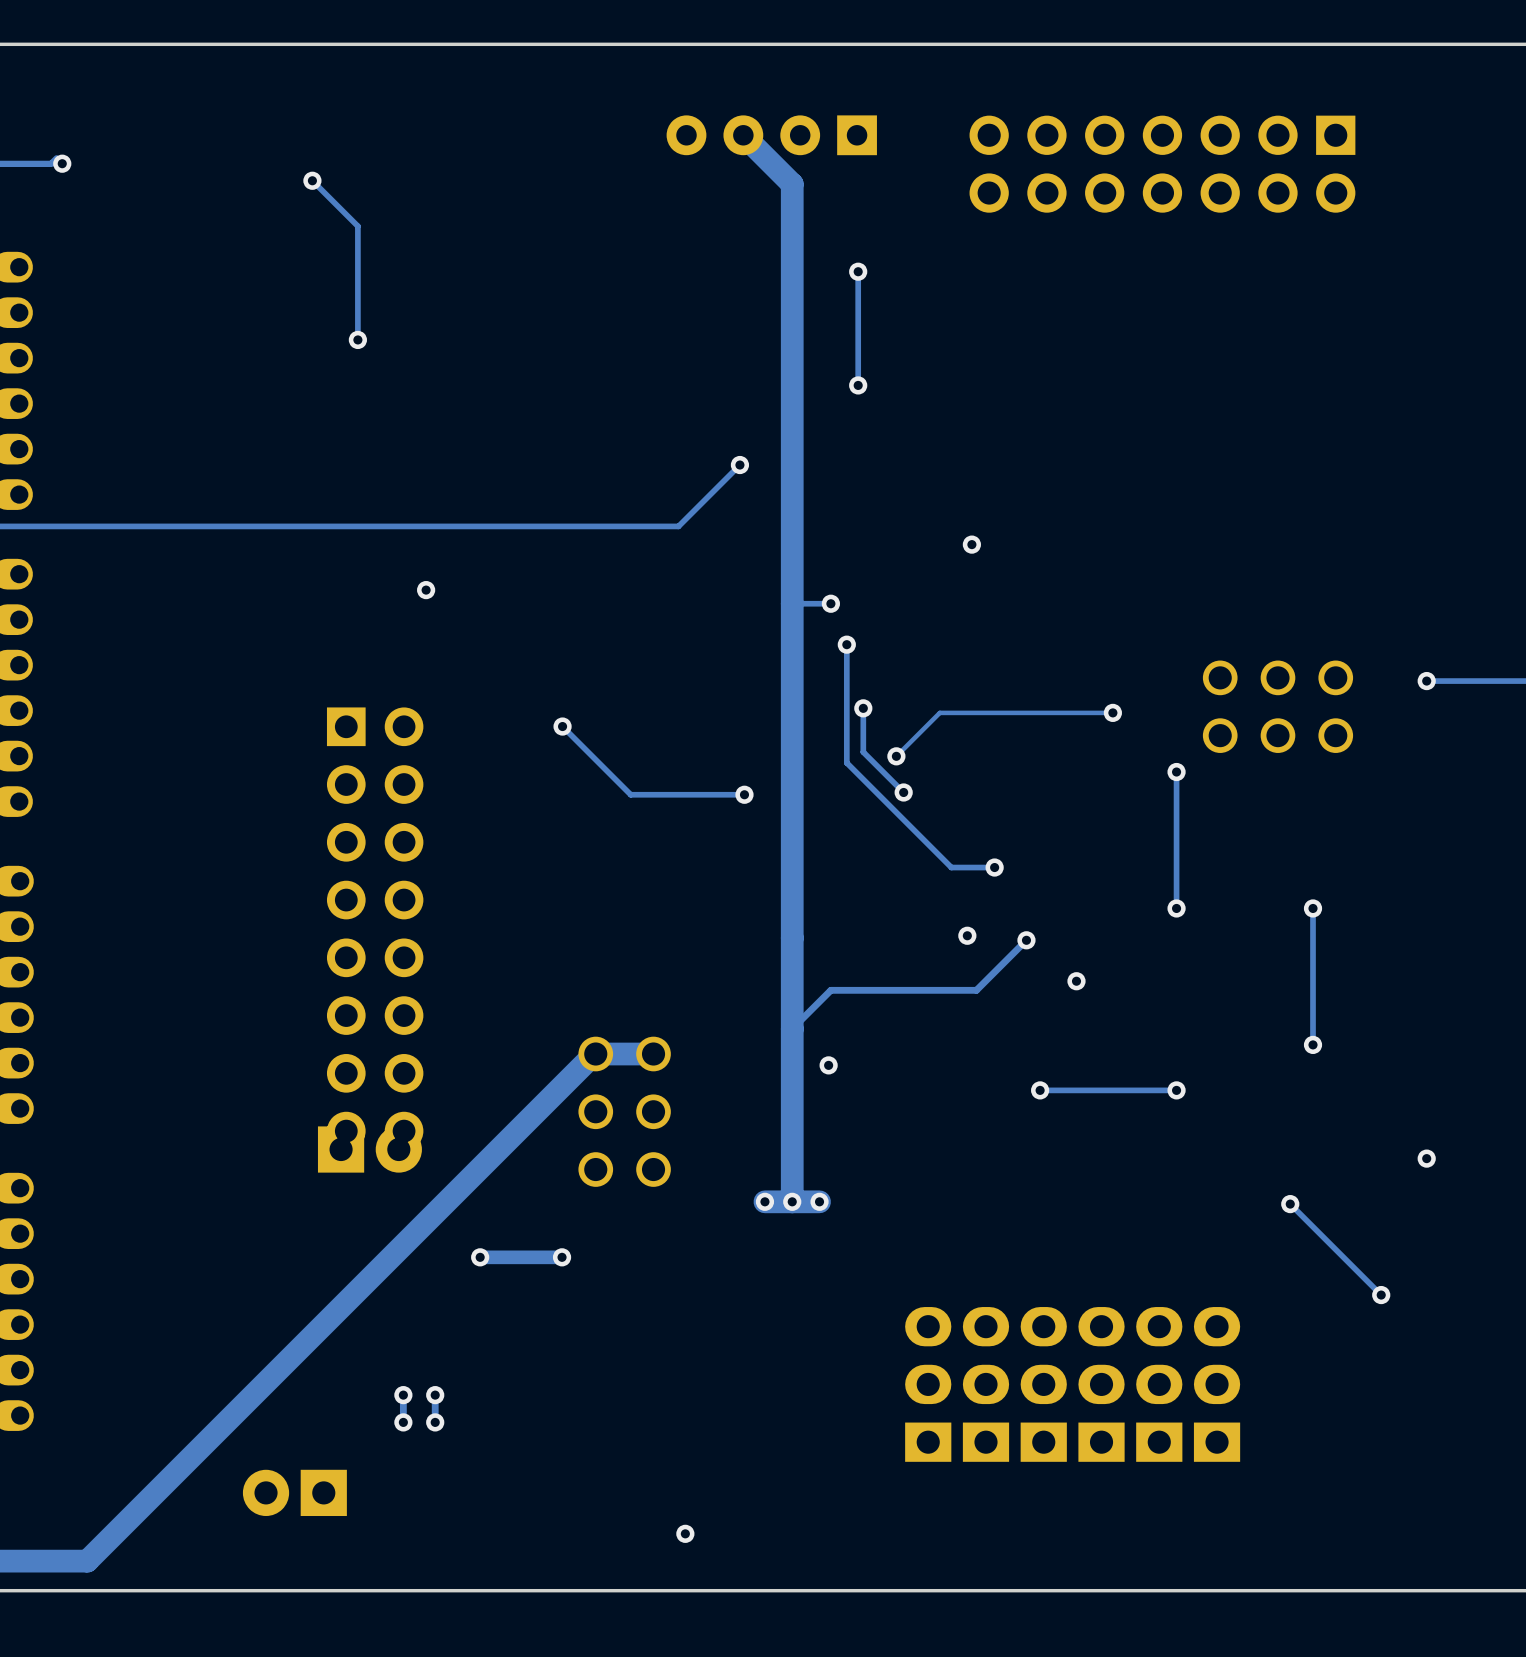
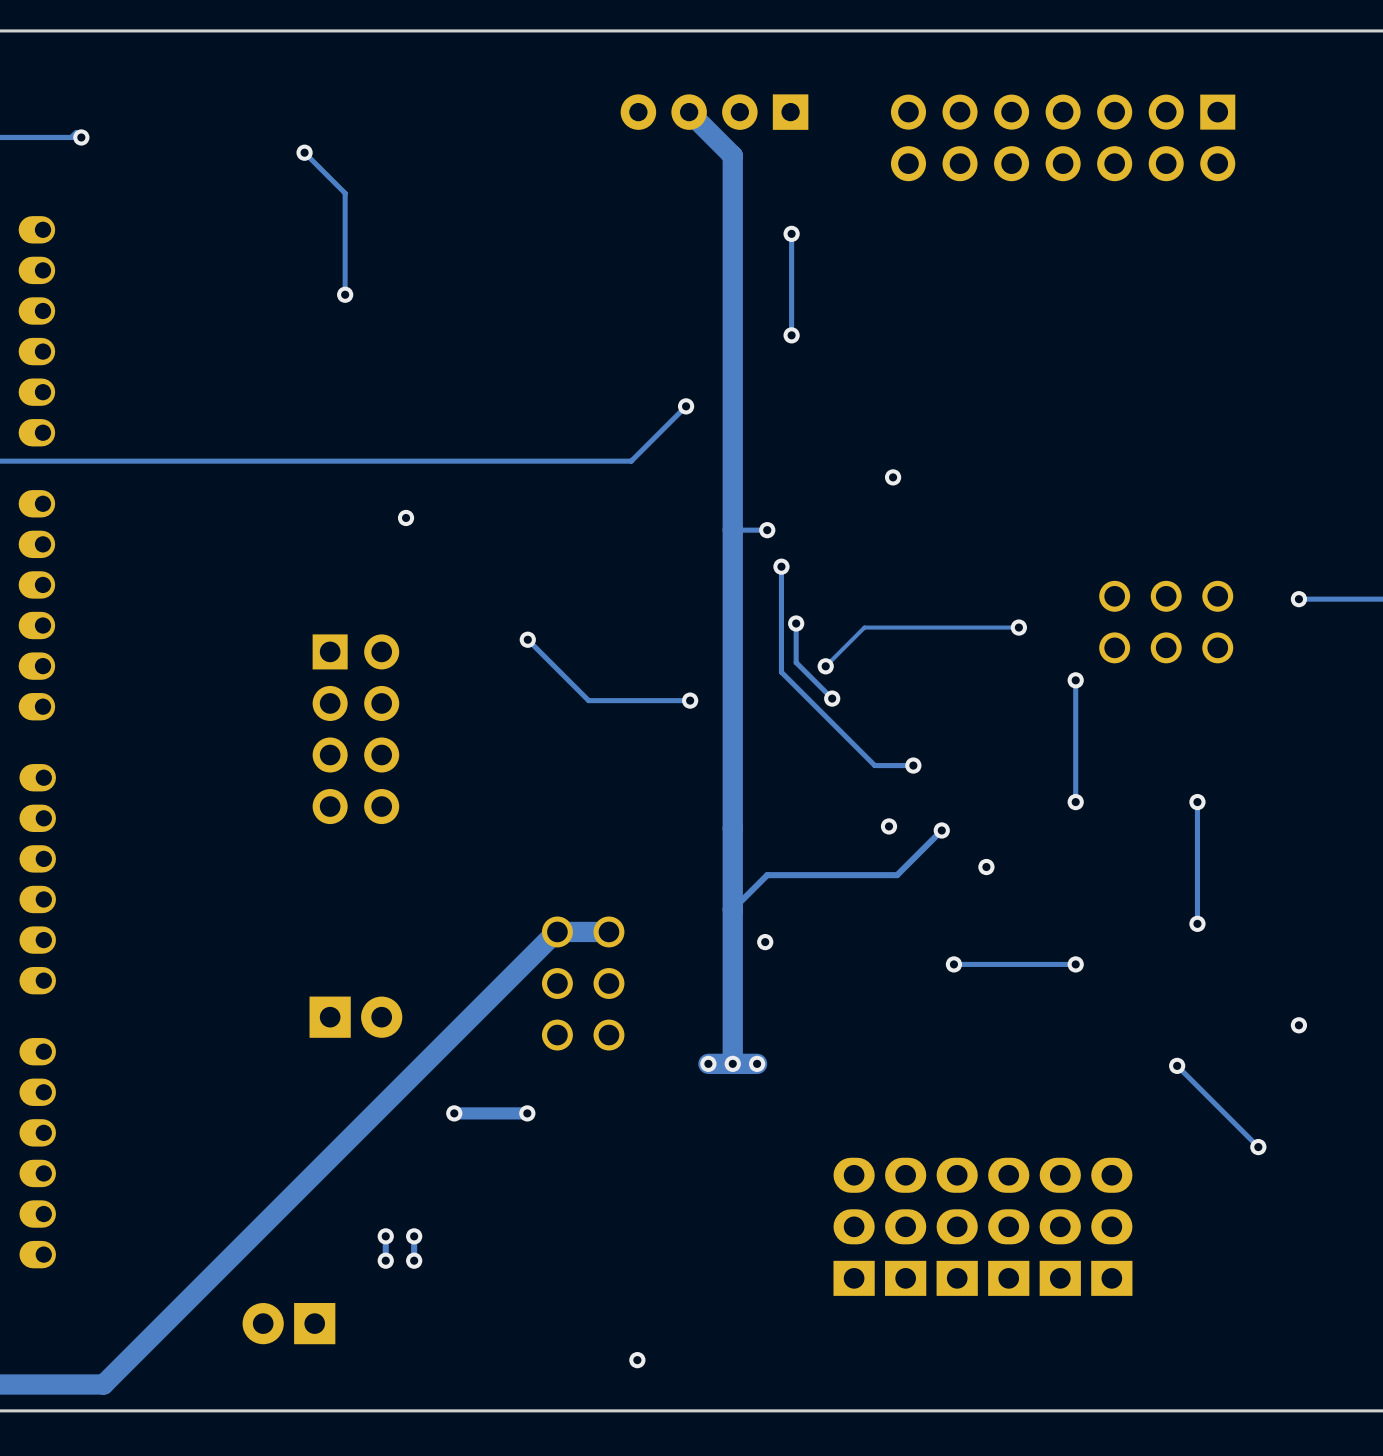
part: none -> (355, 729)
part: (375, 928) -> none

